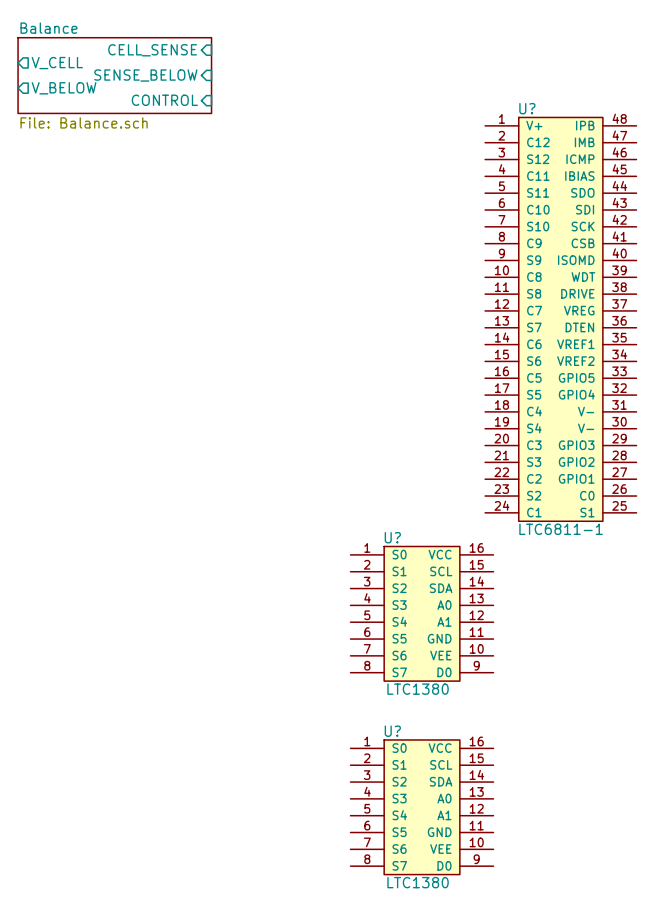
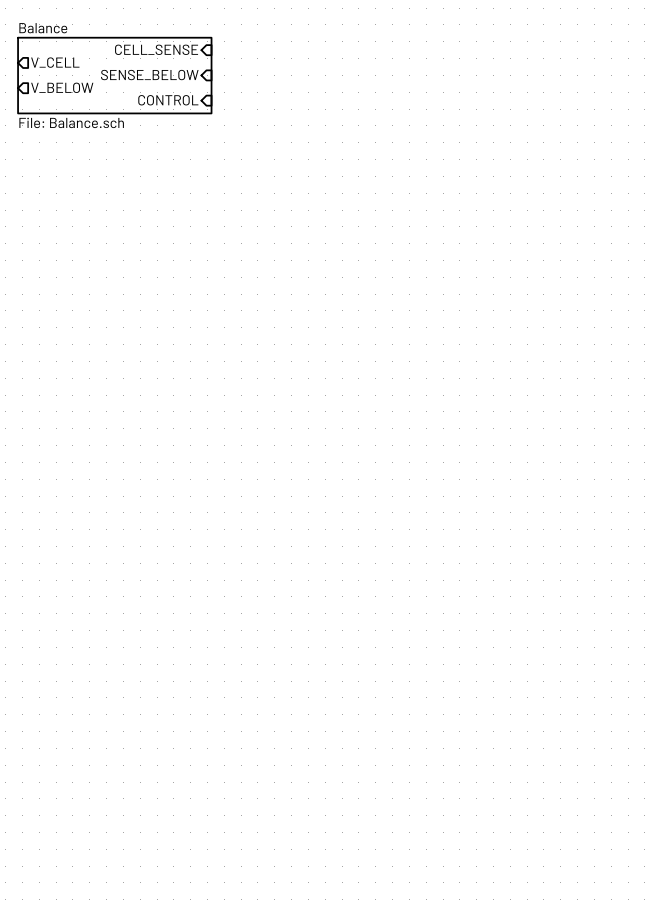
U?: LTC6811-1 (560, 319) -> none
U?: LTC1380 (422, 613) -> none
U?: LTC1380 (422, 807) -> none

